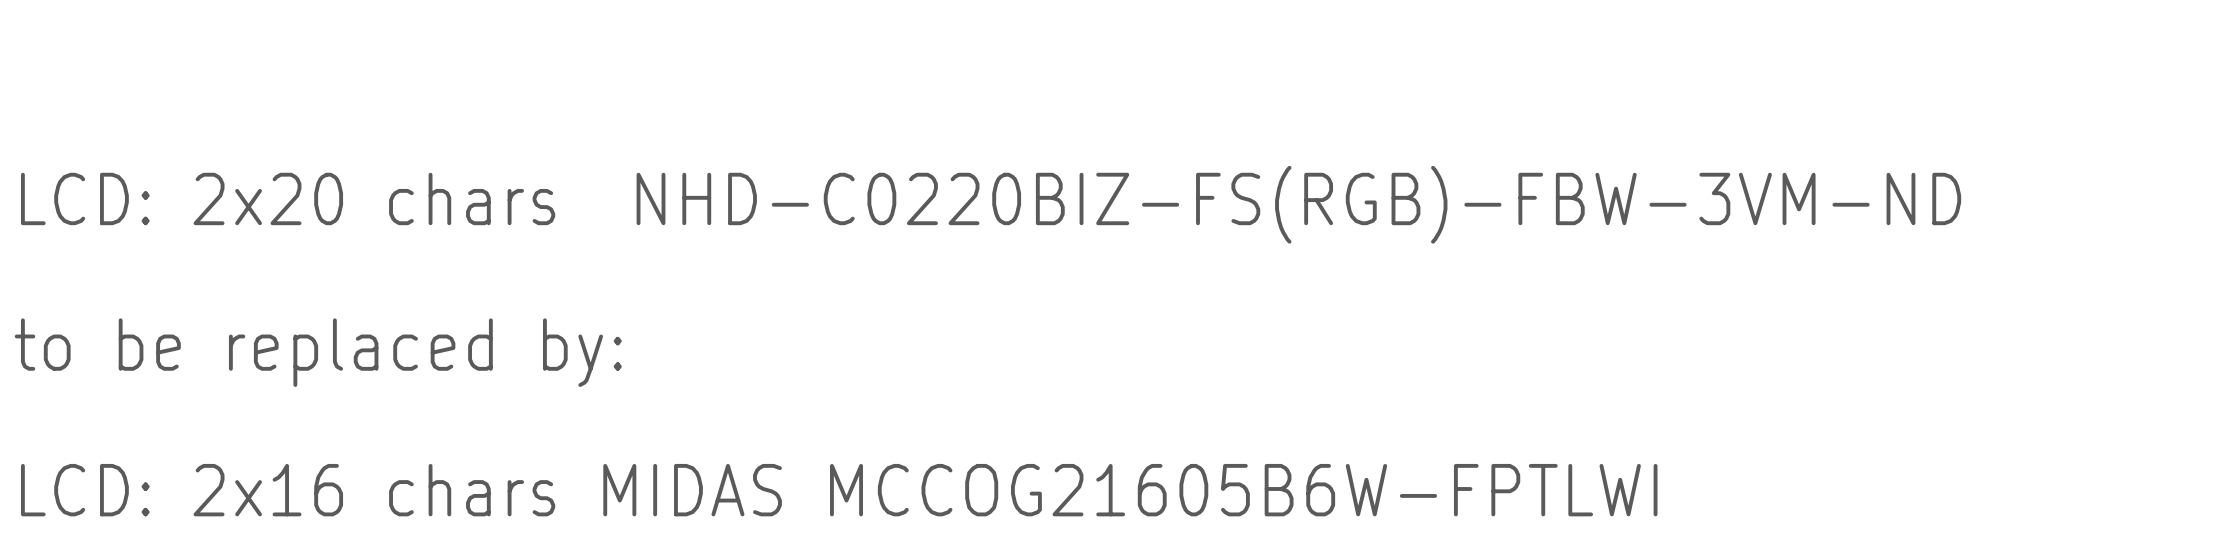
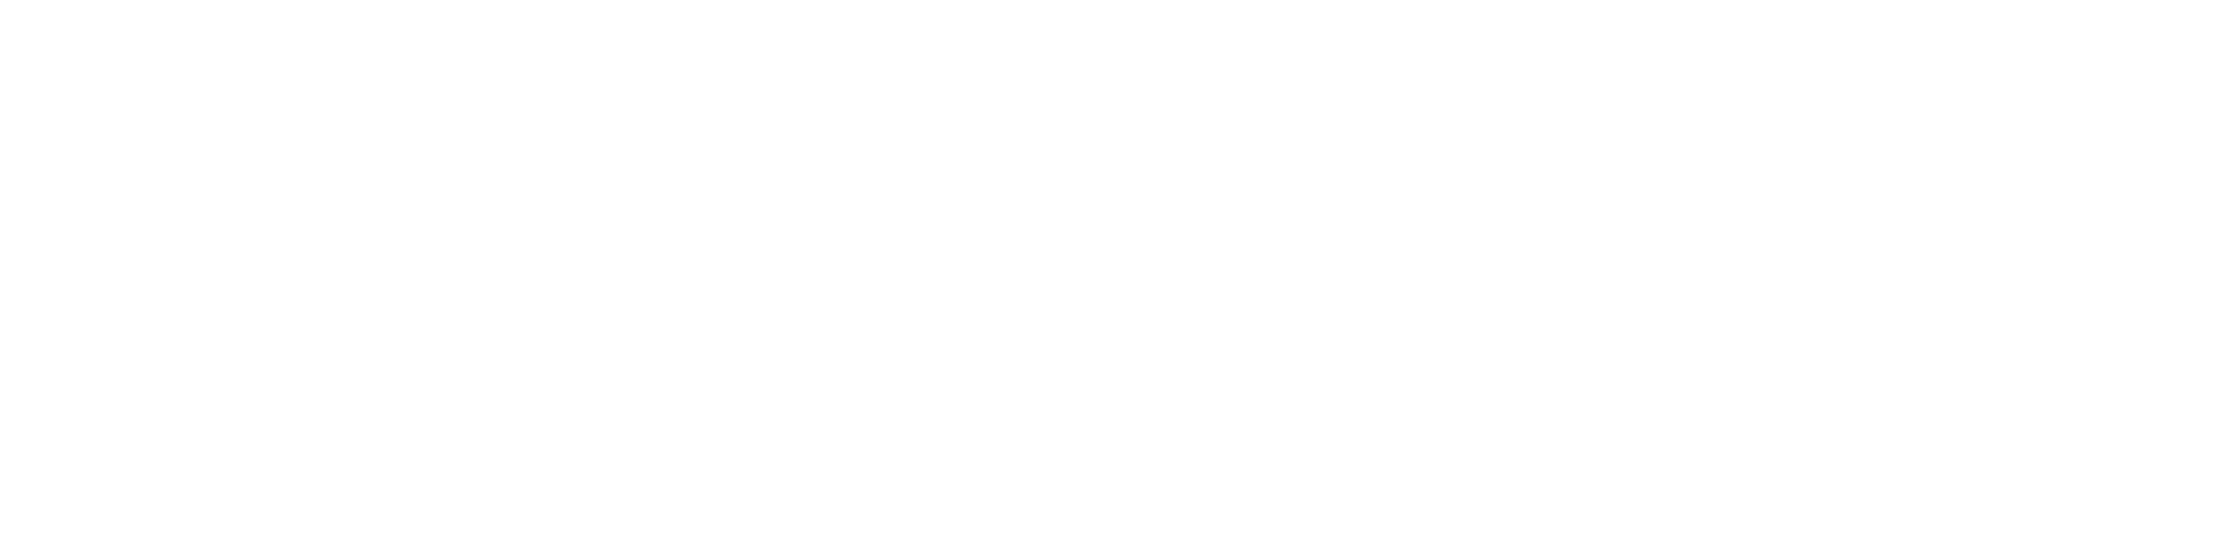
text: LCD: 2x20 chars NHD-C0220BIZ-FS(RGB)-FBW-3VM-ND (991, 204) -> none
text: to be replaced by: (318, 352) -> none
text: LCD: 2x16 chars MIDAS MCCOG21605B6W-FPTLWI (839, 490) -> none

